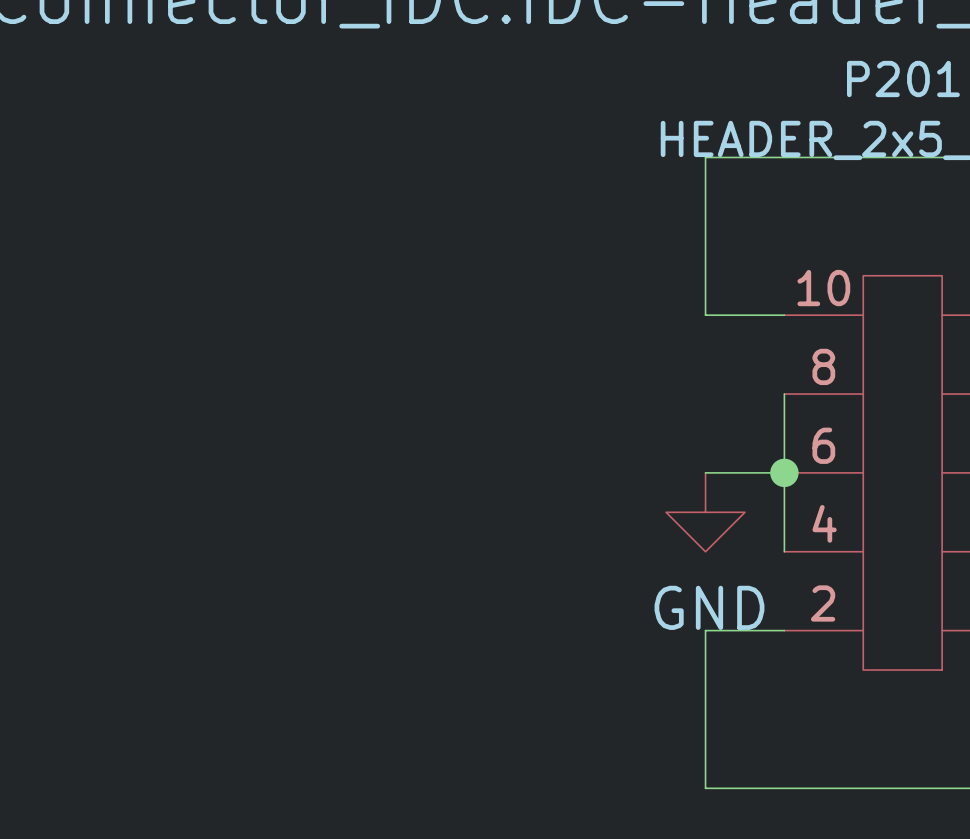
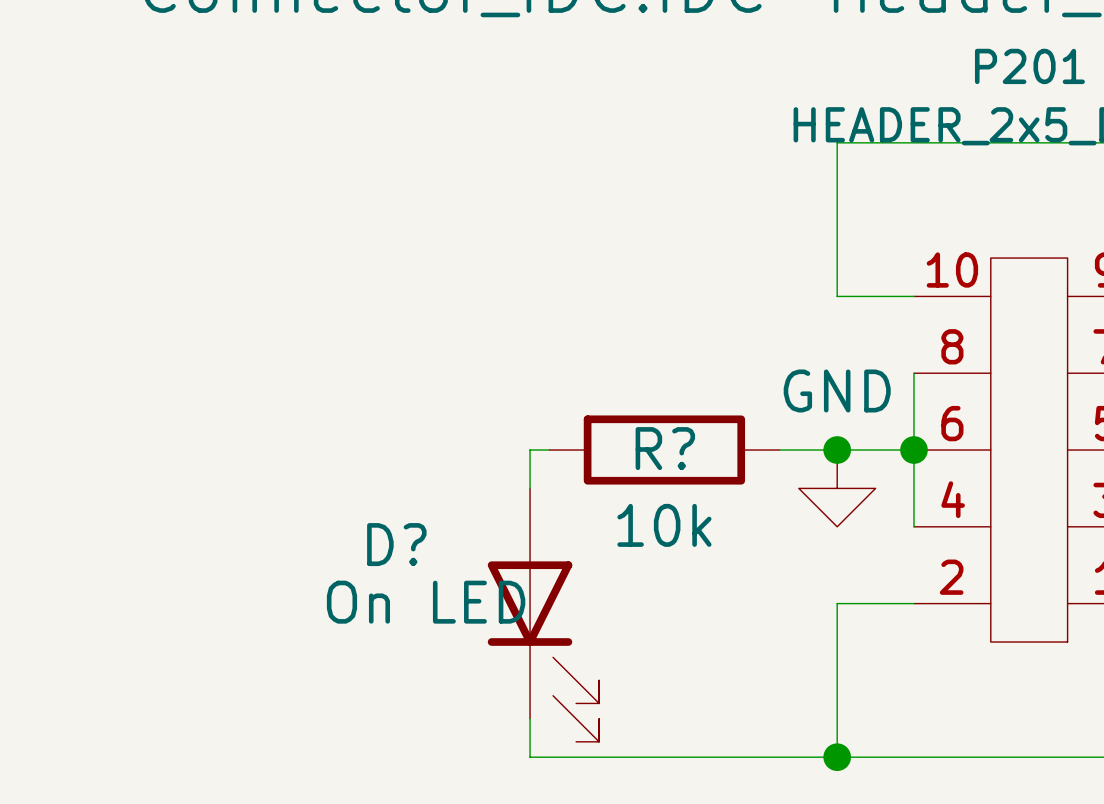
wire: none -> (549, 450) (530, 450) (530, 488)
R?: none -> 10k (664, 450)
wire: none -> (779, 450) (837, 450)
junction: none -> (837, 450)
power symbol text position: GND (709, 607) -> GND (837, 390)
D?: none -> On LED (543, 615)
wire: none -> (530, 718) (530, 757) (837, 757)
junction: none -> (837, 757)

